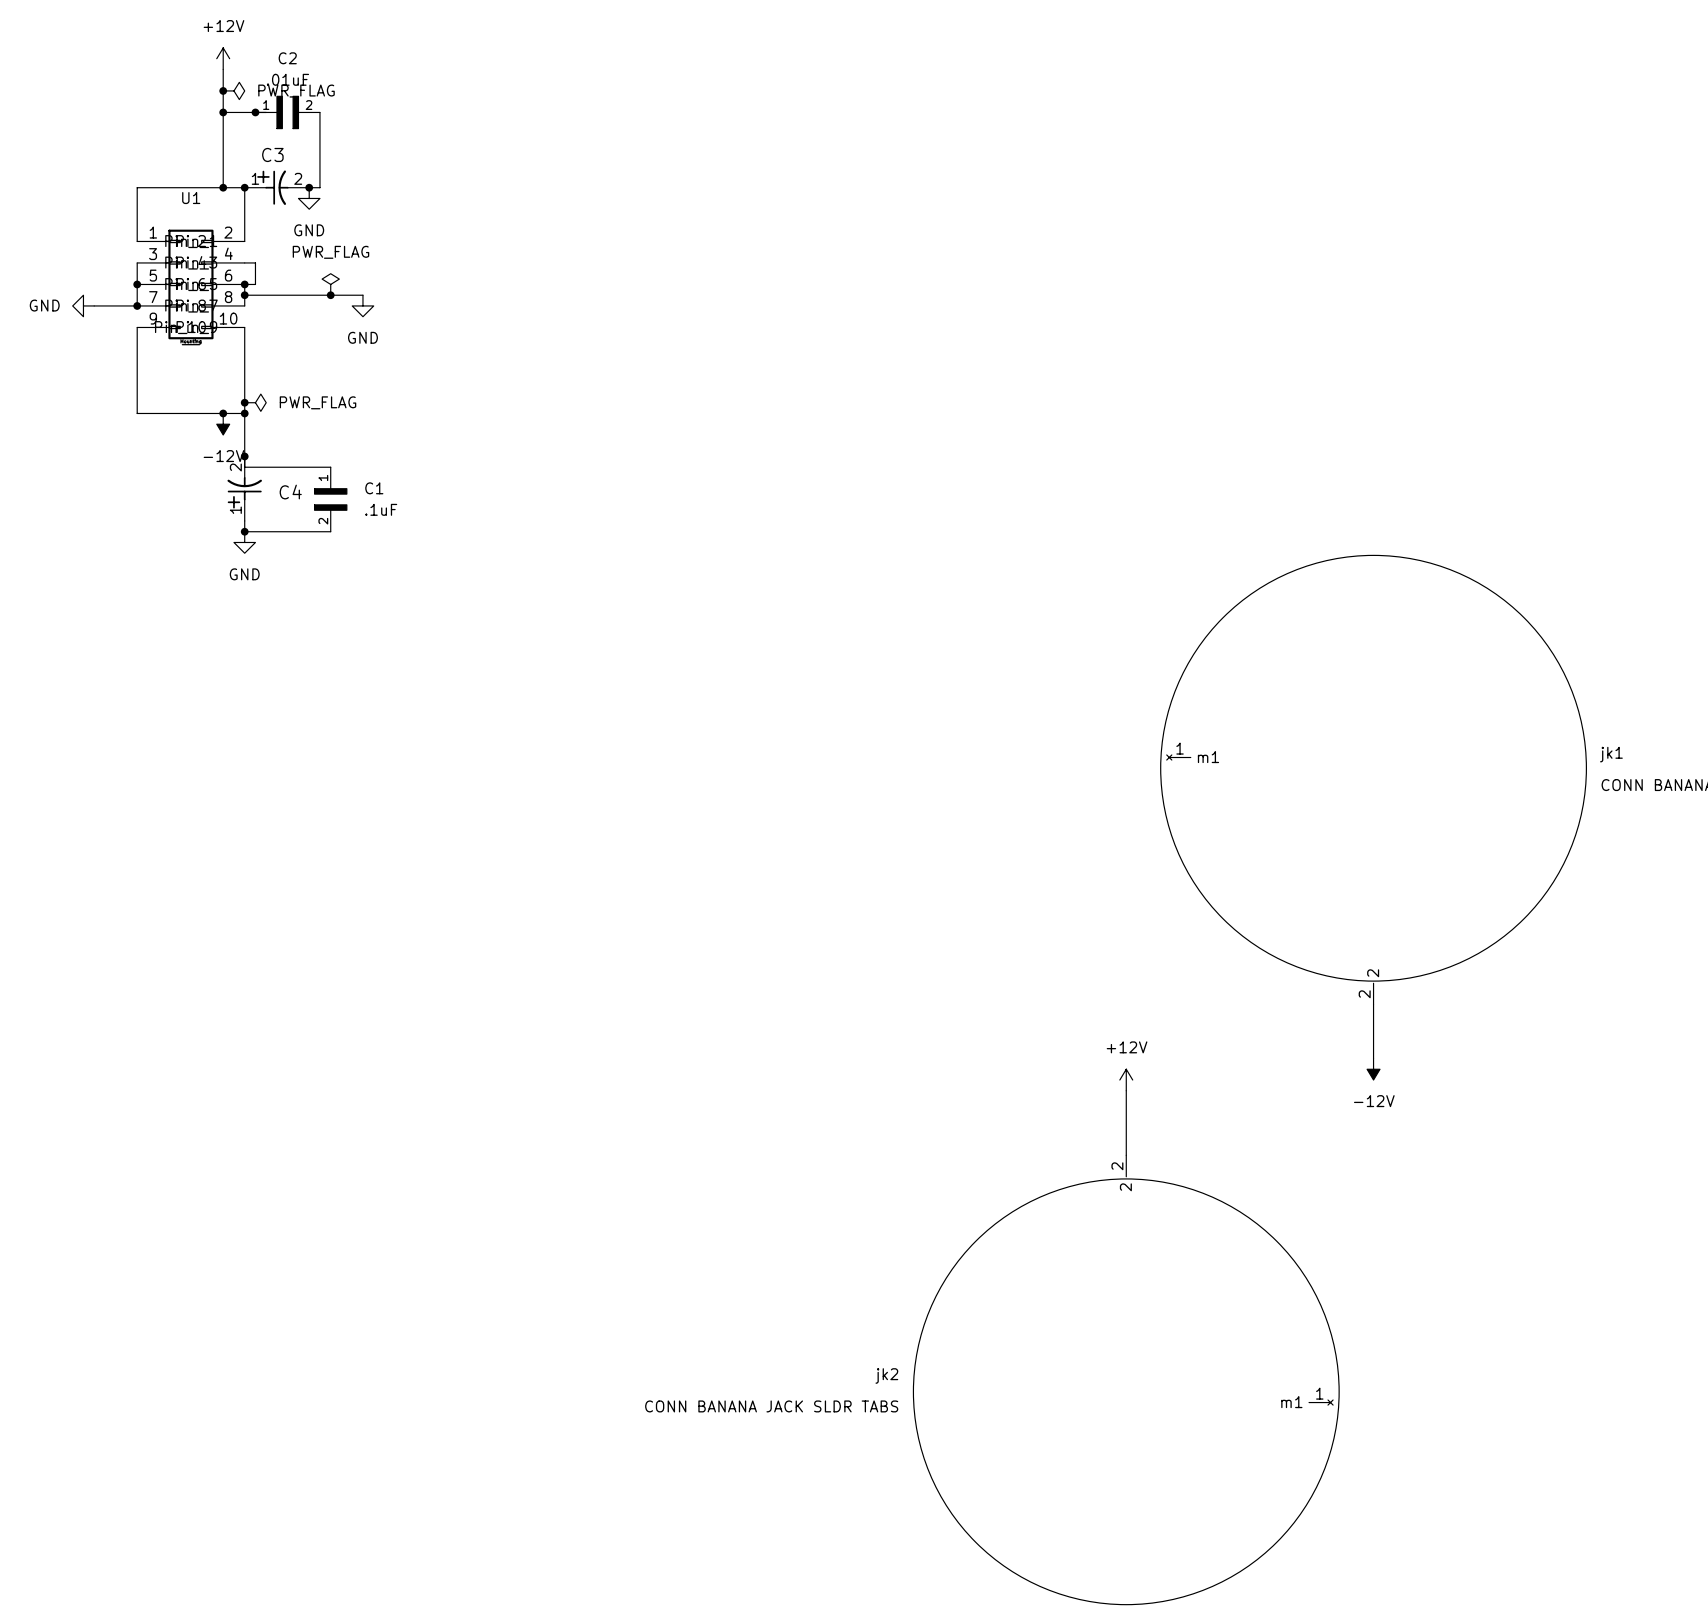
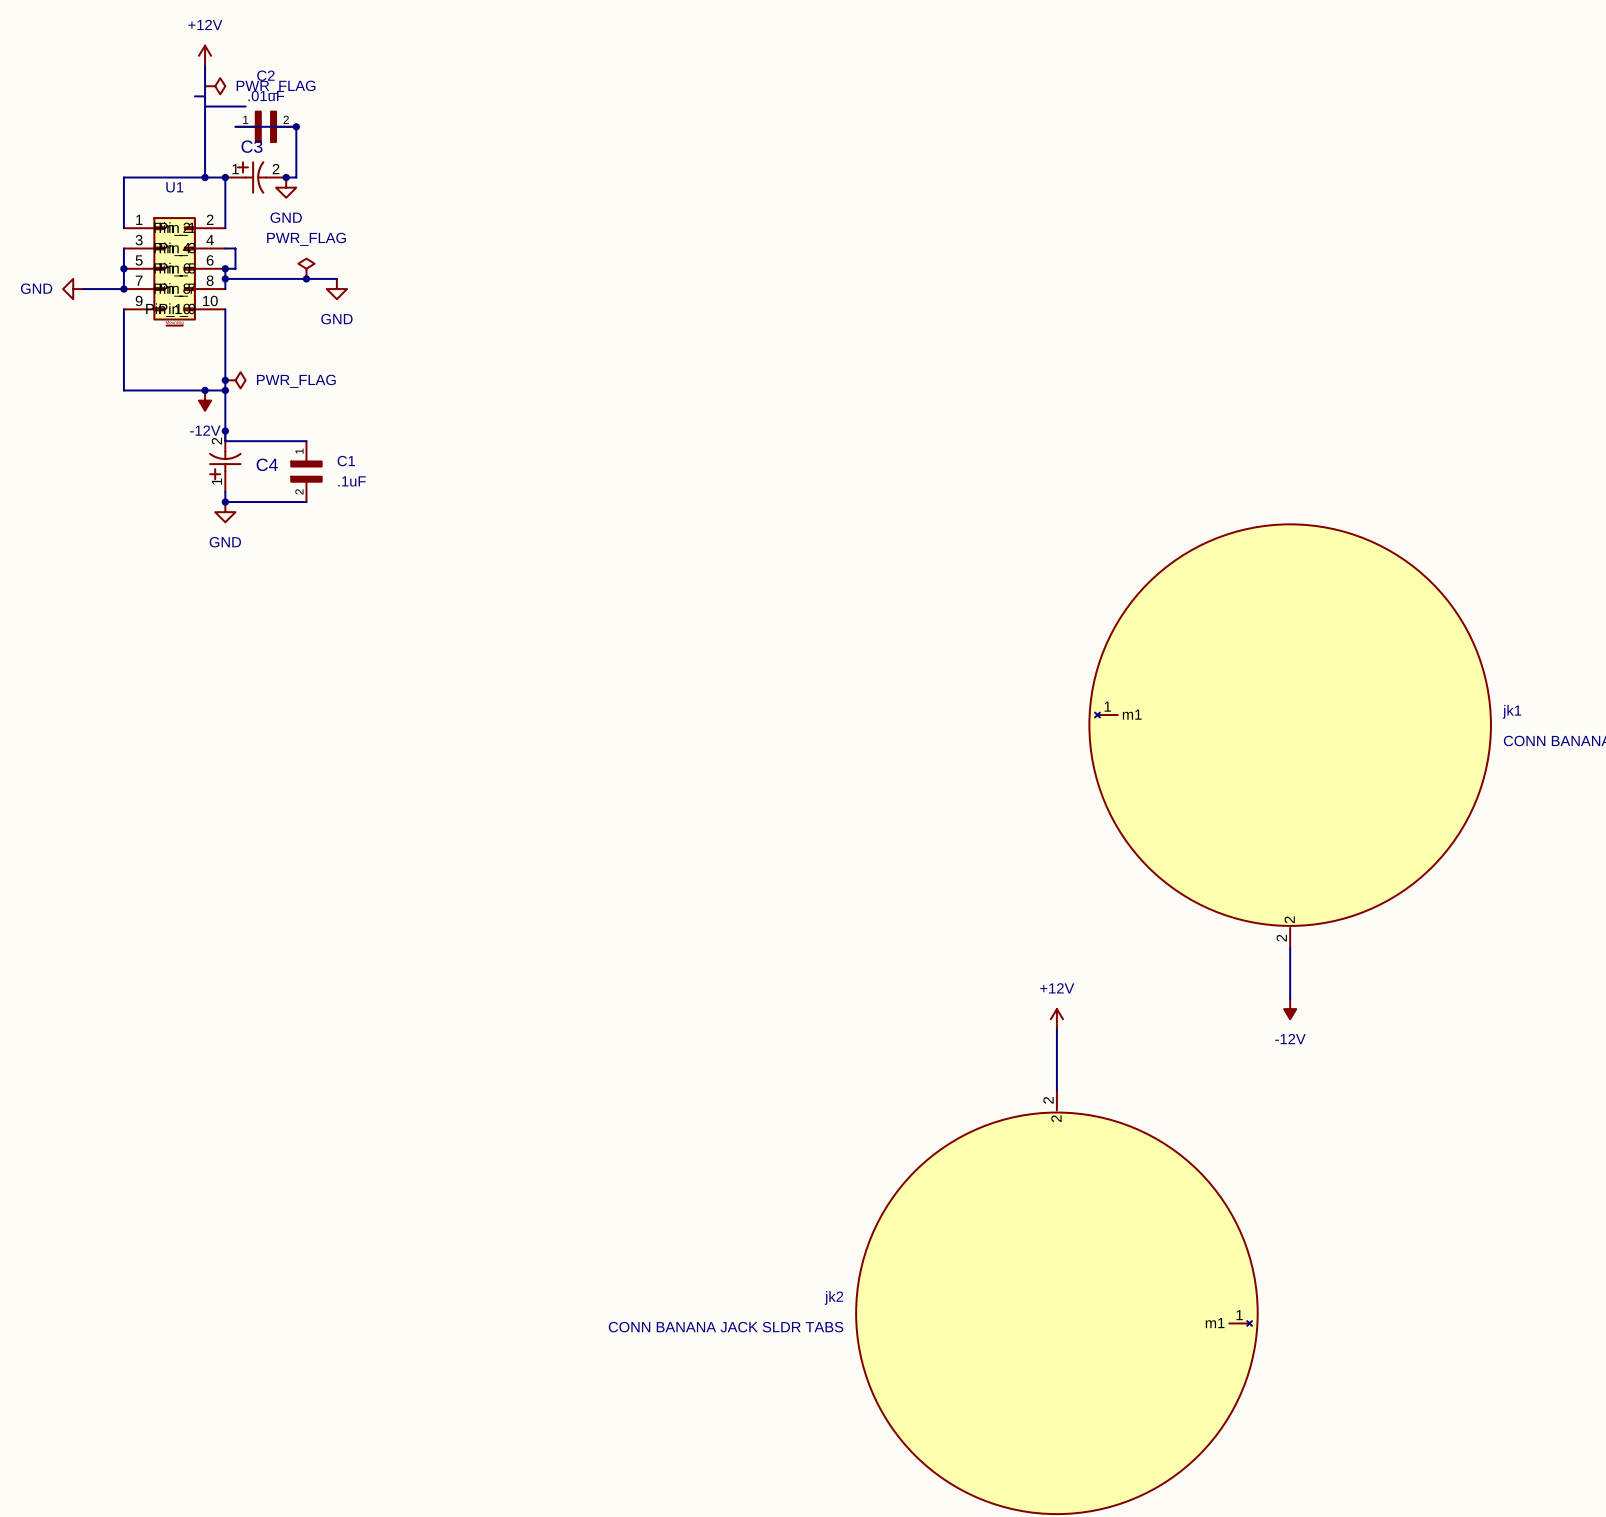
junction: (223, 90) -> none
wire: none -> (194, 96) (205, 96)
junction: (223, 112) -> none
junction: (255, 112) -> none
C2 position: (287, 112) -> (265, 126)
wire: (319, 112) (319, 133) -> (235, 126) (296, 126)
junction: none -> (296, 126)

